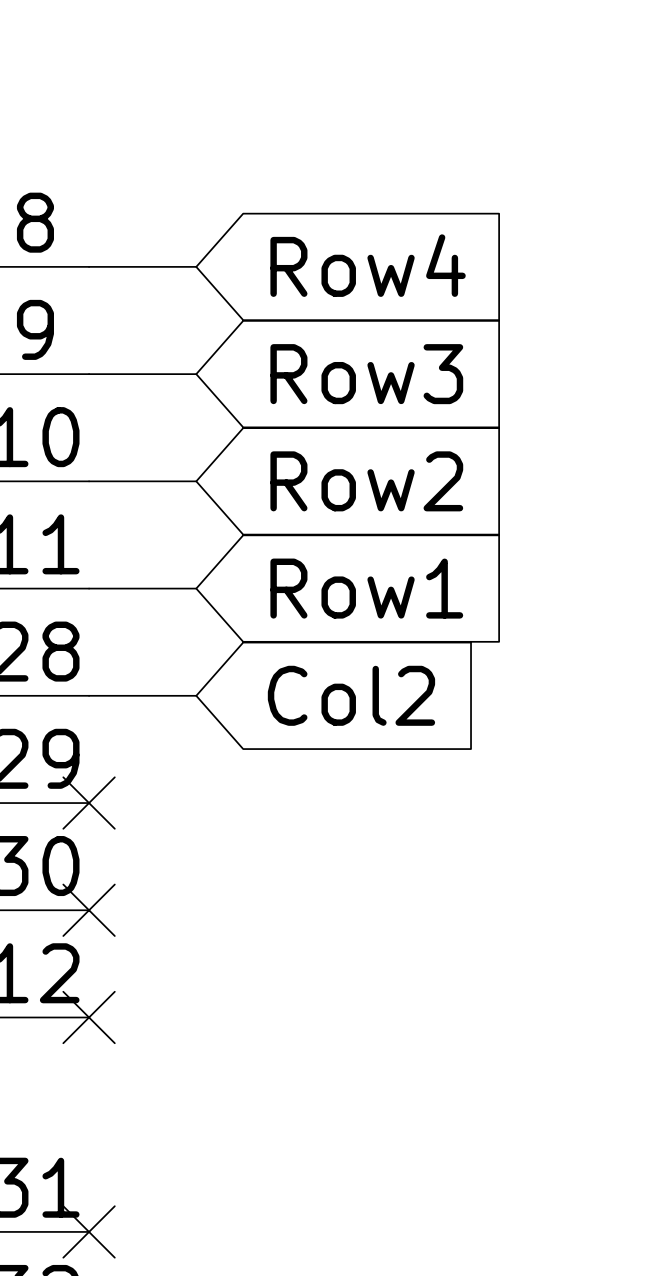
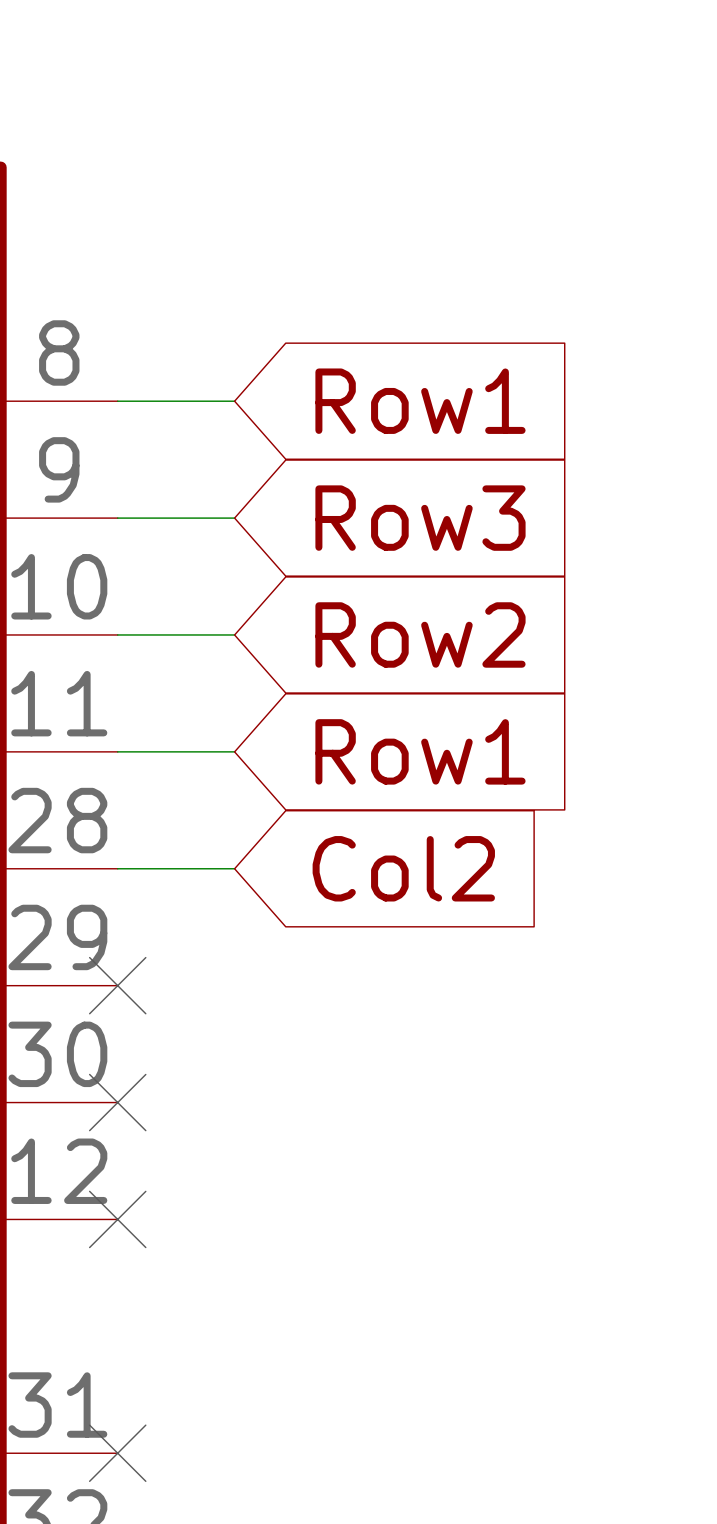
global label: Row4 (368, 265) -> Row1 (420, 401)

